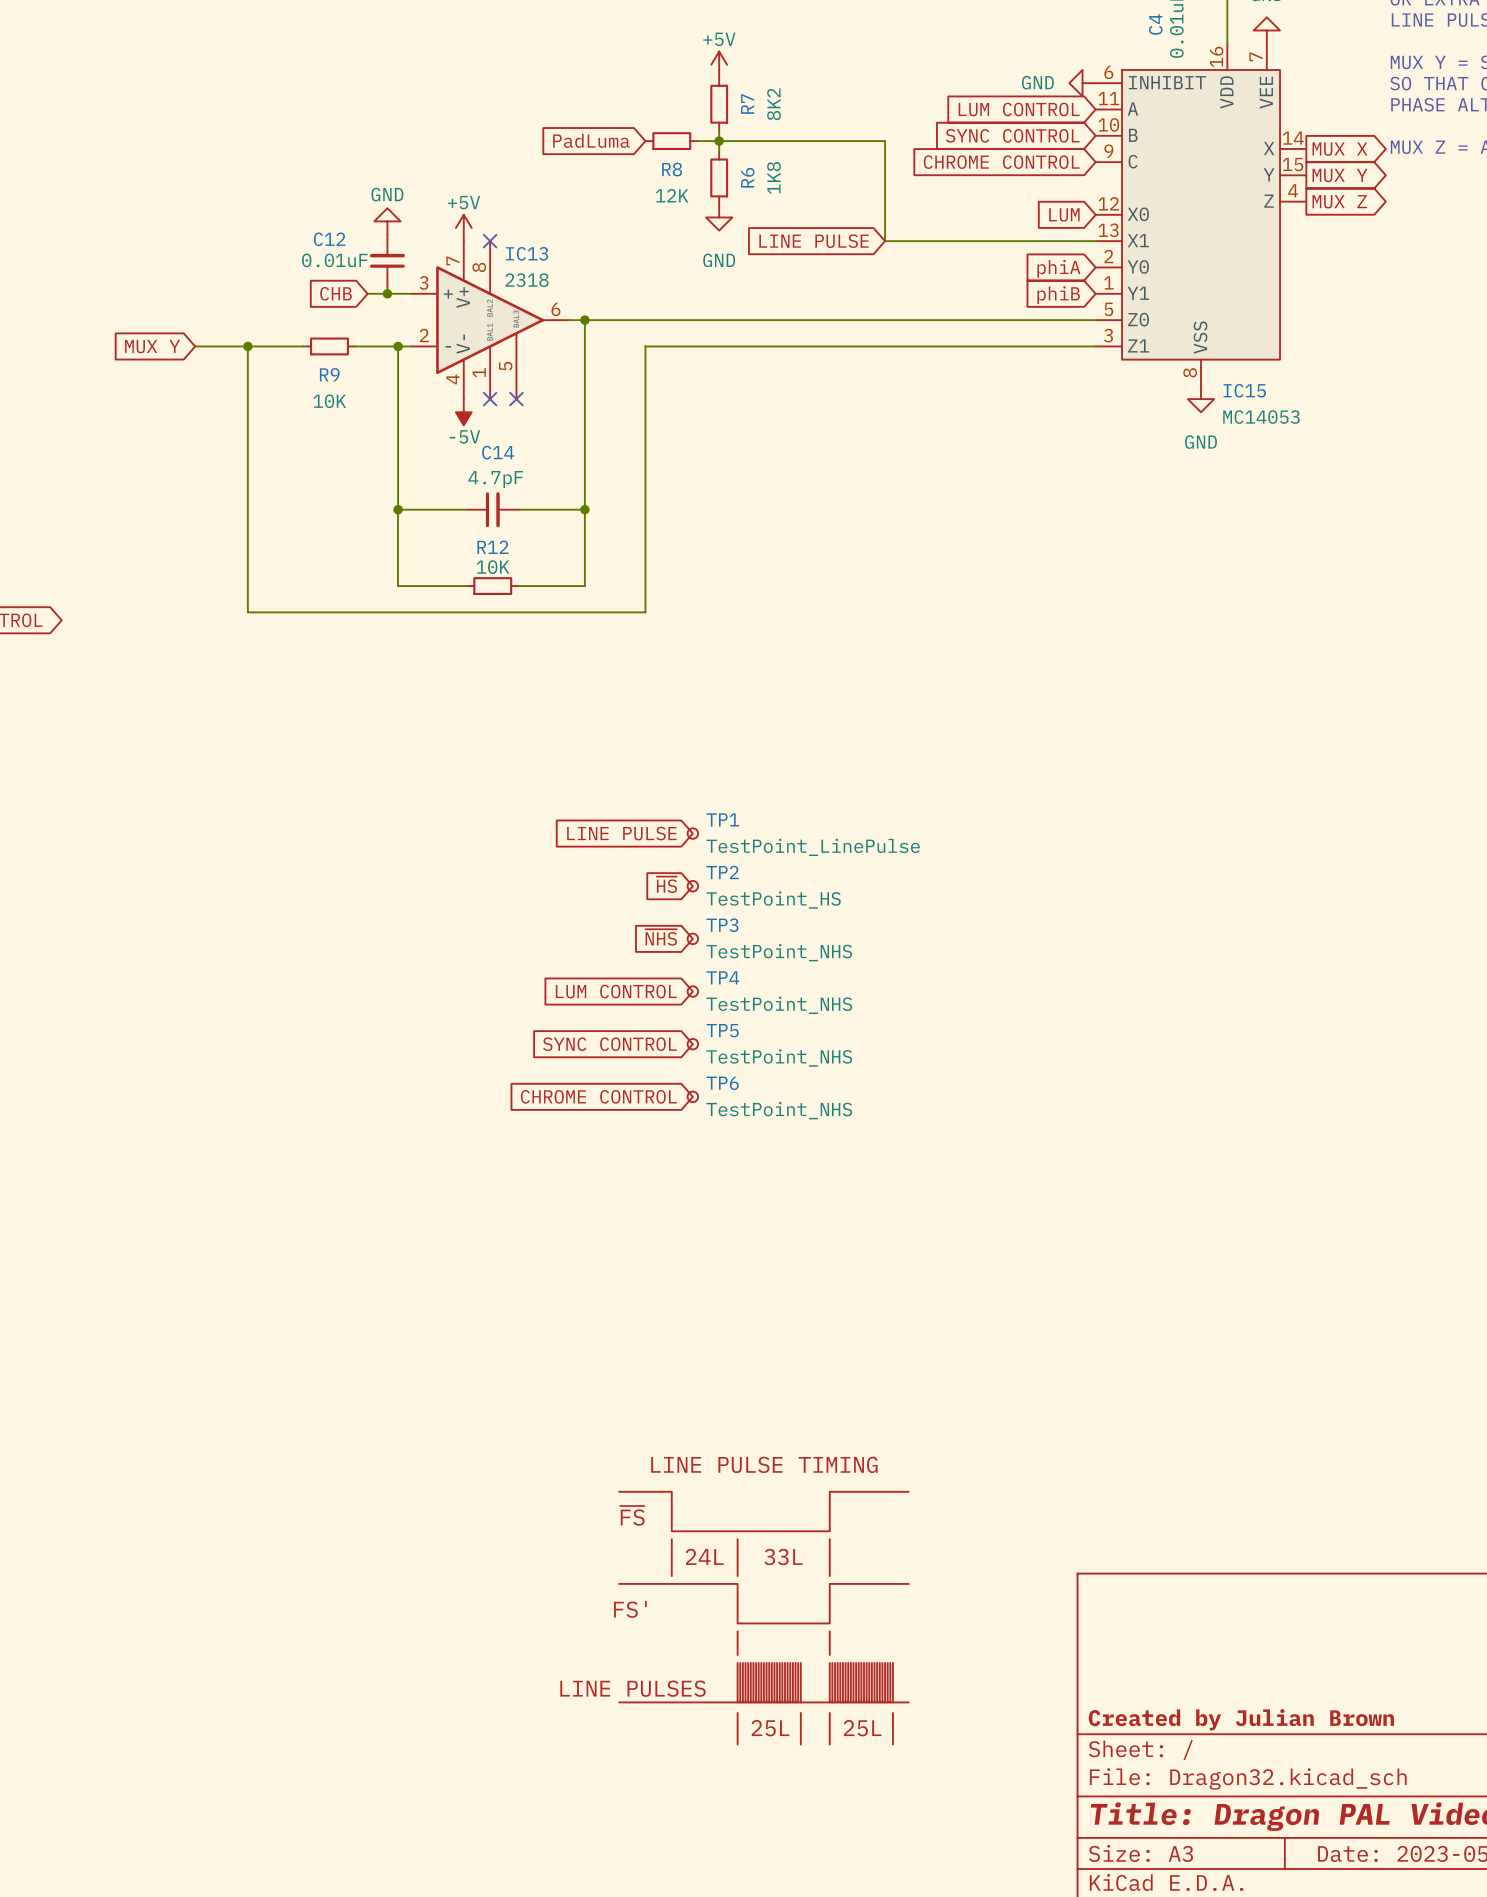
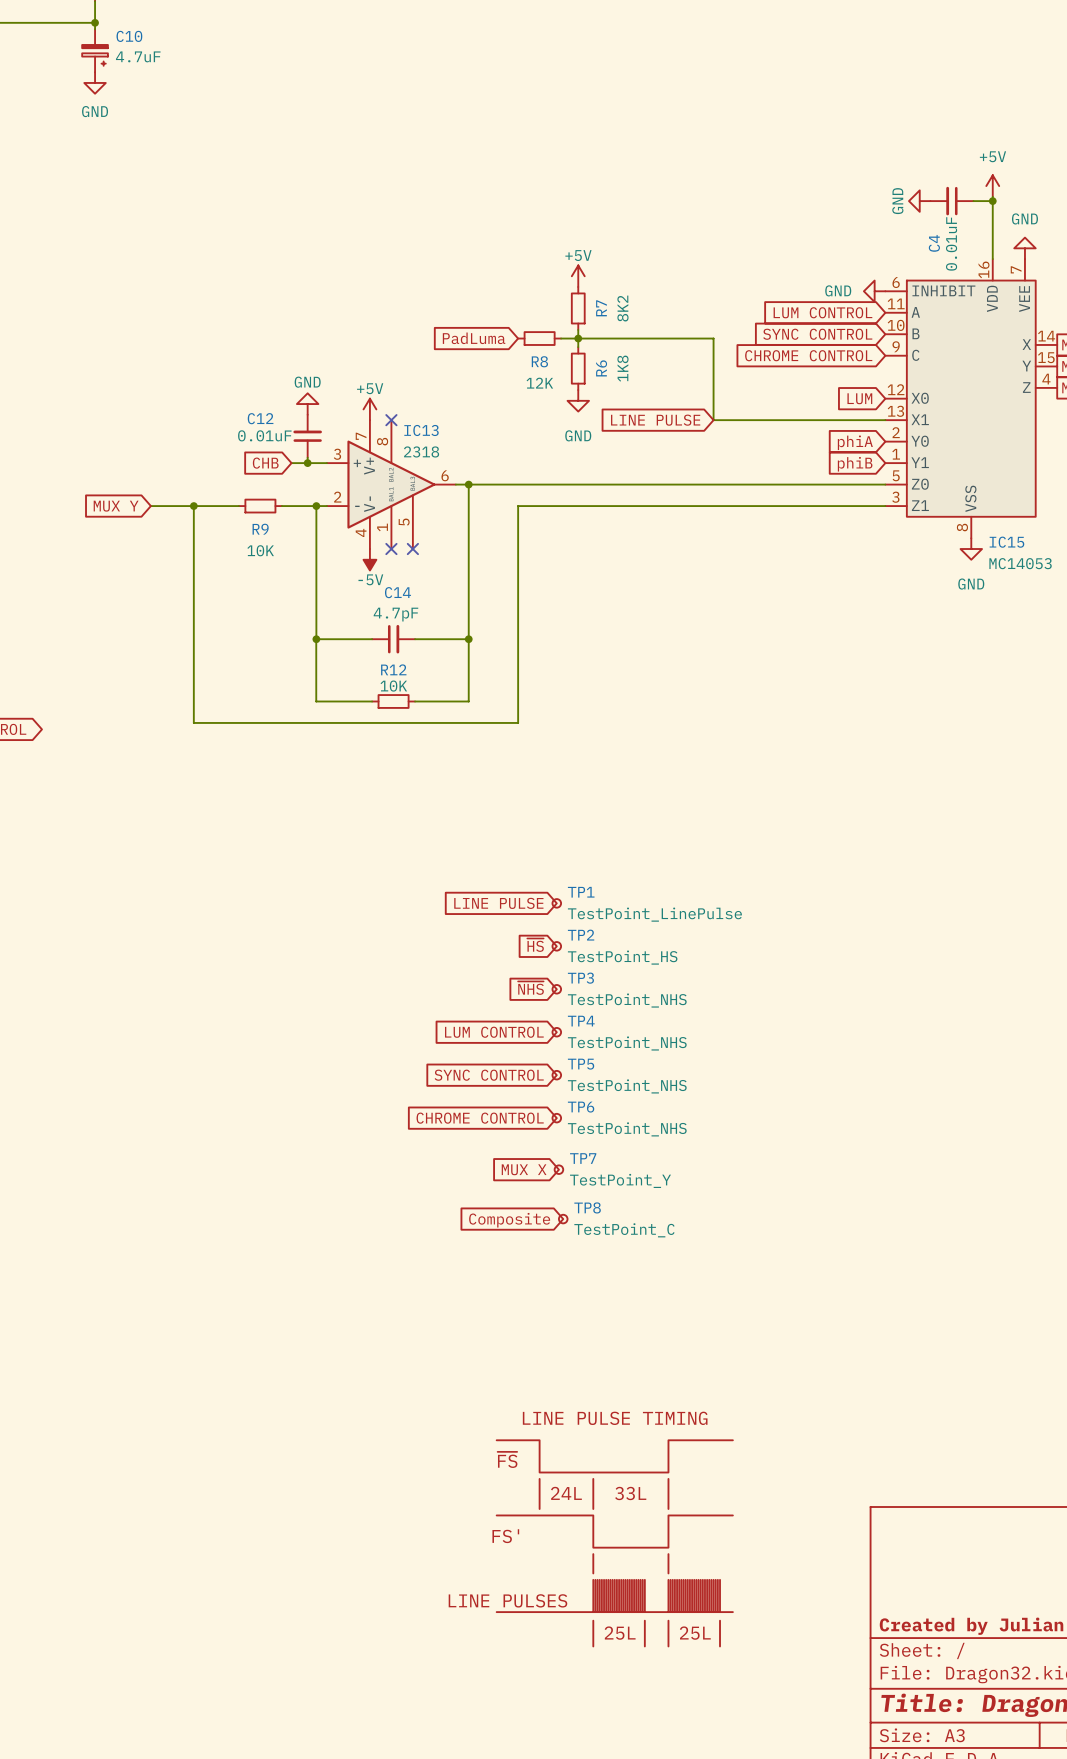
global label: none -> MUX X (524, 1169)
TP7: none -> TestPoint_Y (558, 1169)
TP8: none -> TestPoint_C (563, 1219)
global label: none -> Composite (509, 1220)

